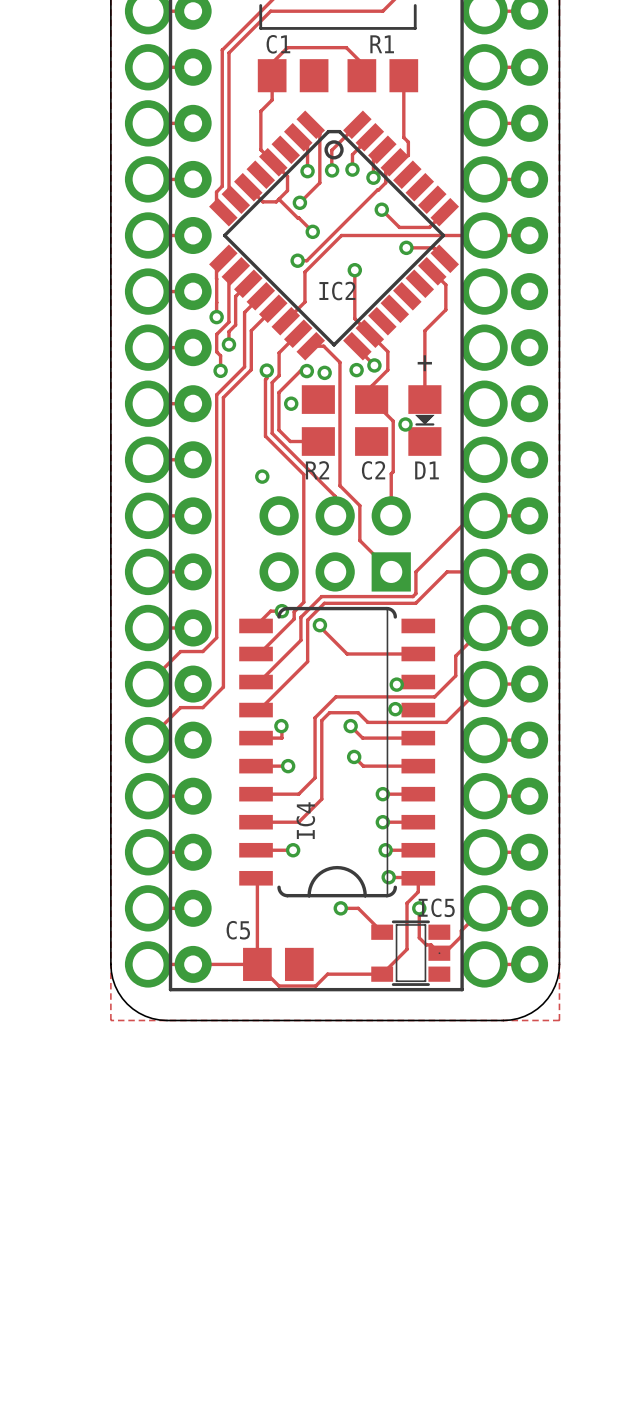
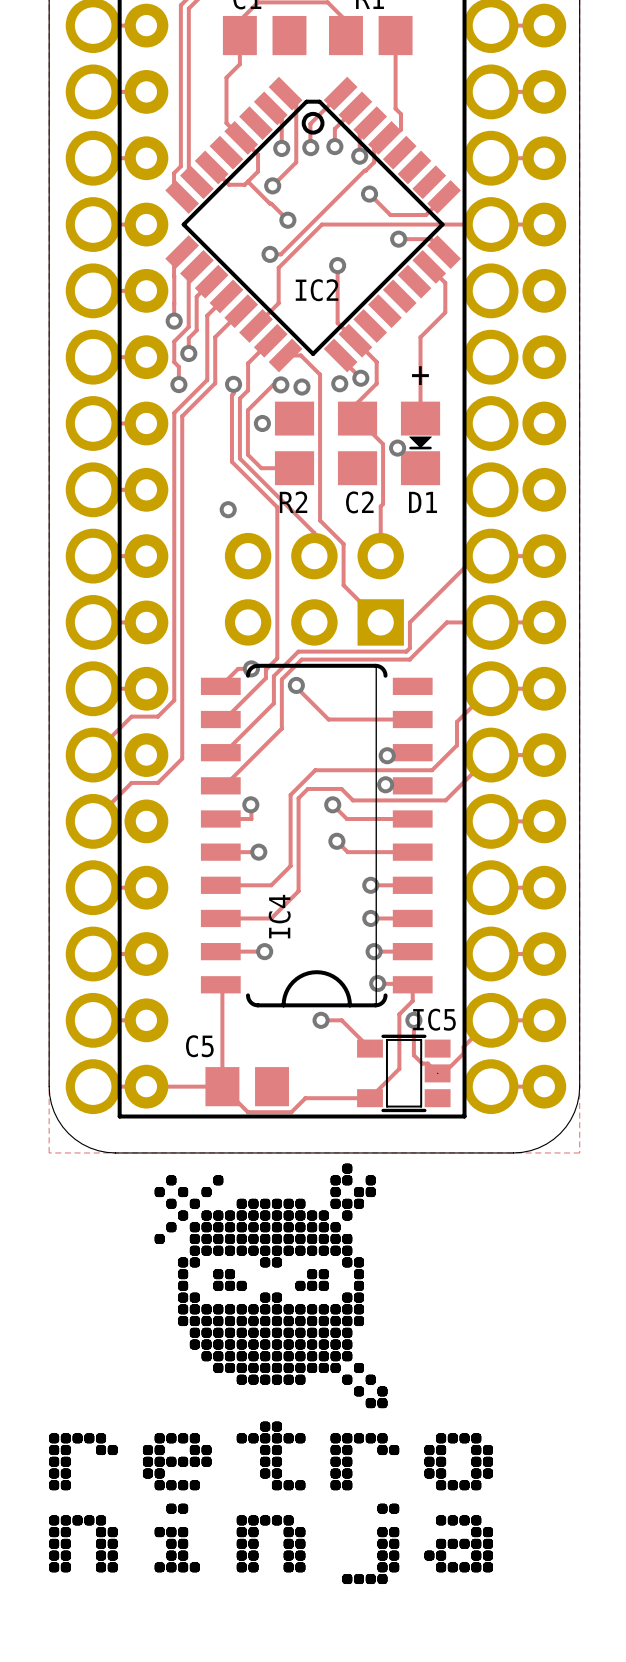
drawing: none -> [49, 1163, 494, 1585]

